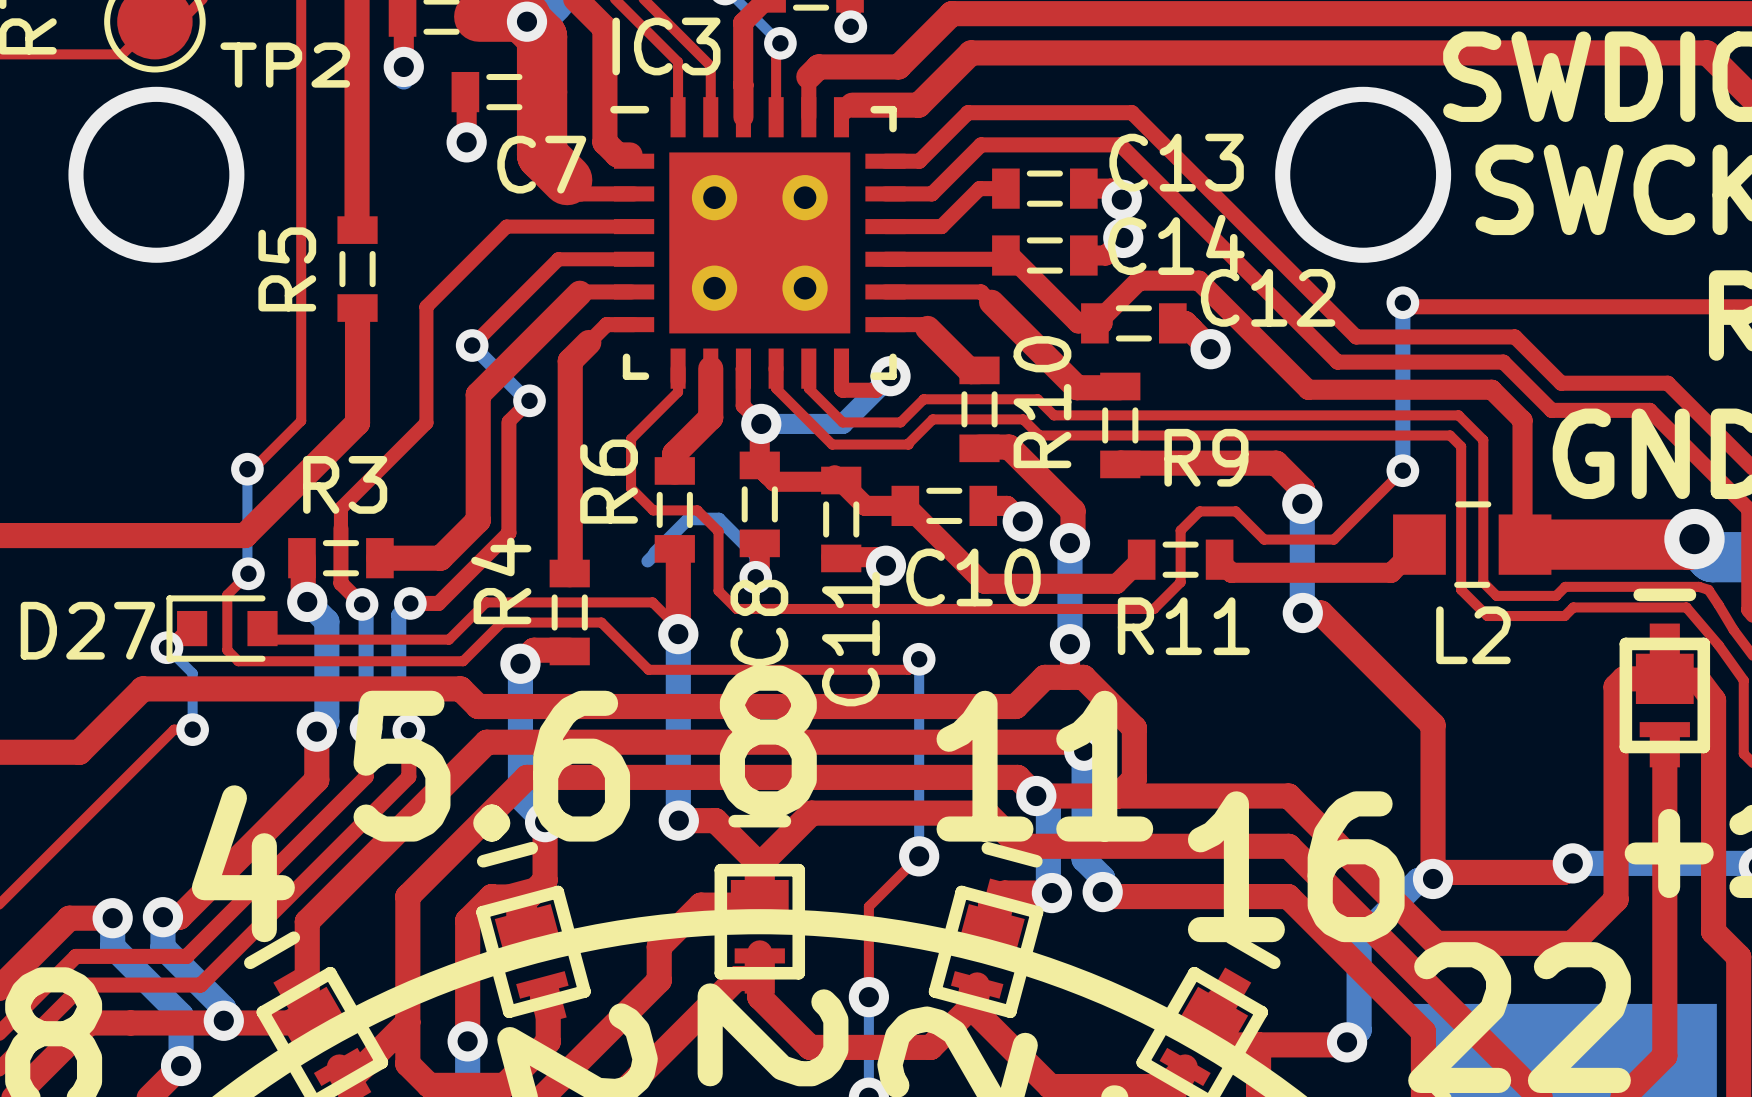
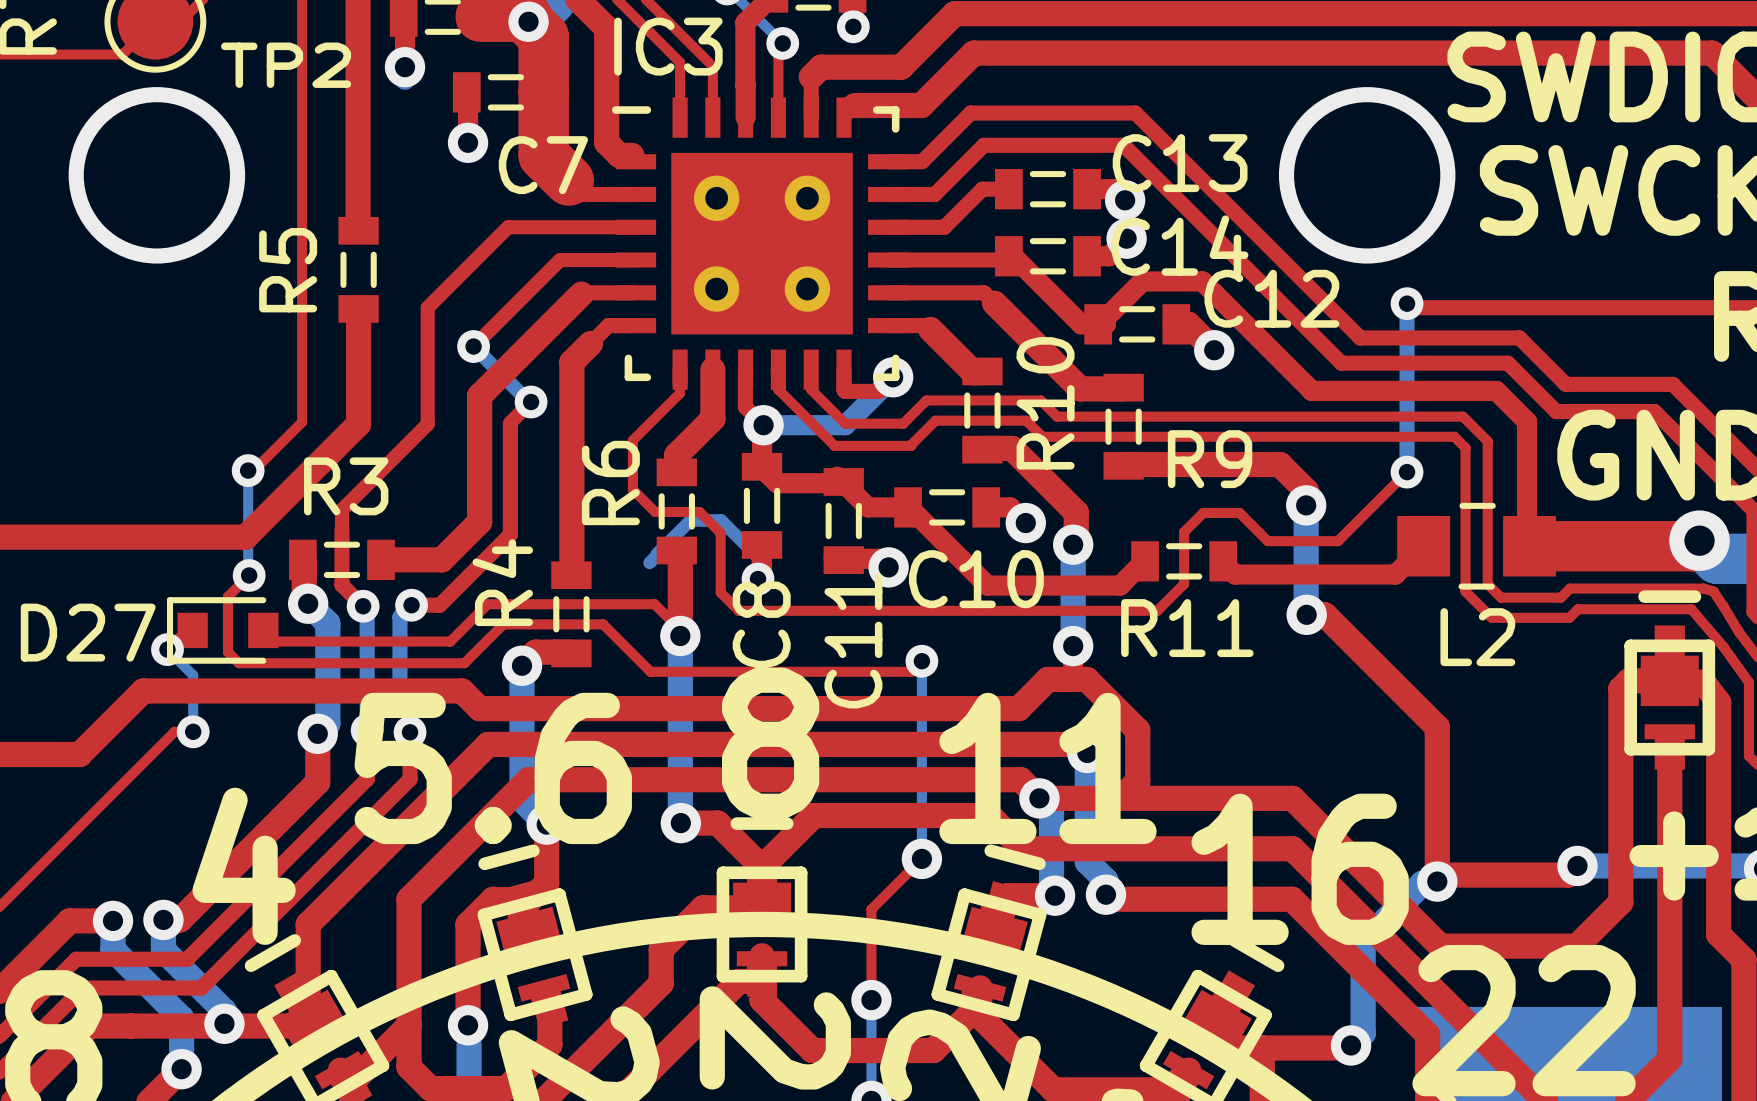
top track: (467, 920) (467, 1041) -> (469, 923) (468, 1025)
via position: (467, 1041) -> (468, 1025)

